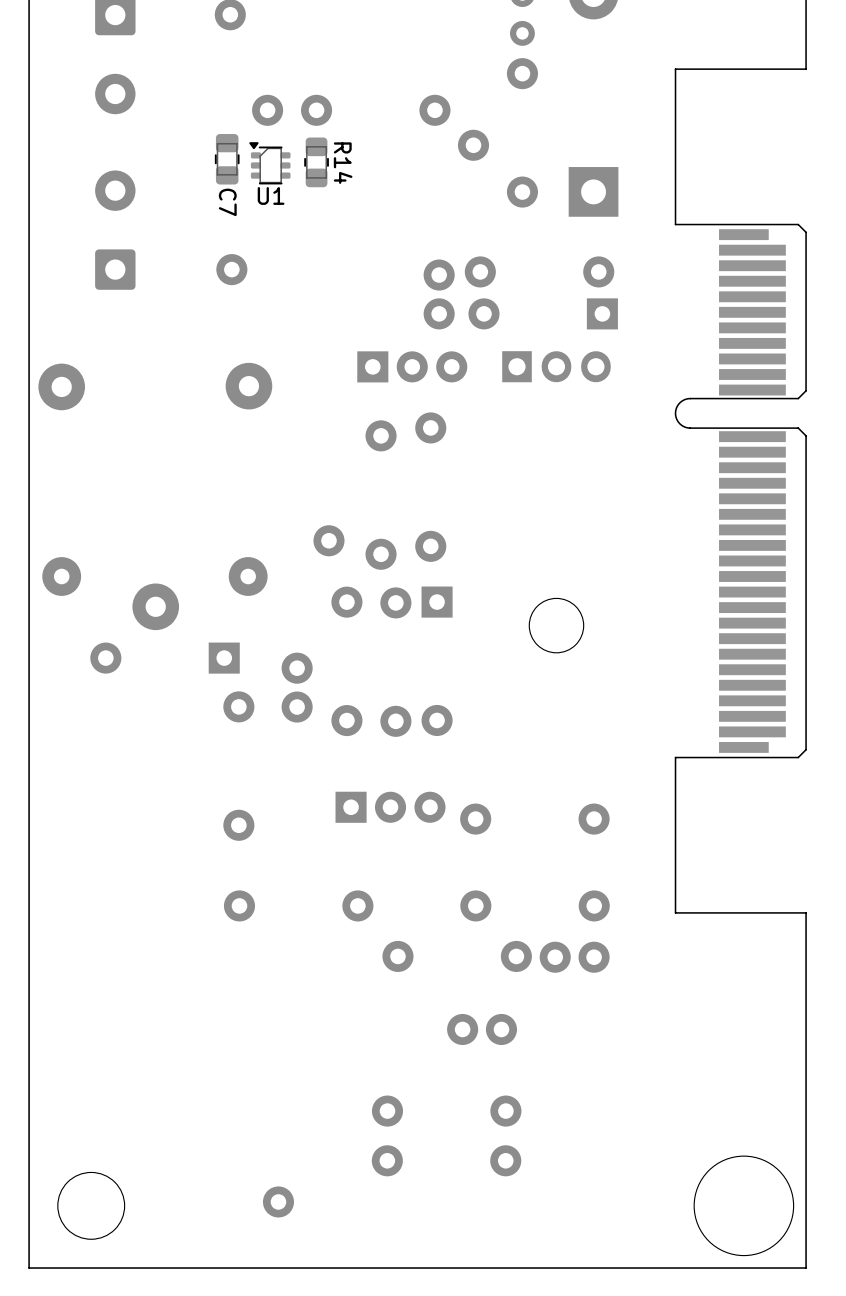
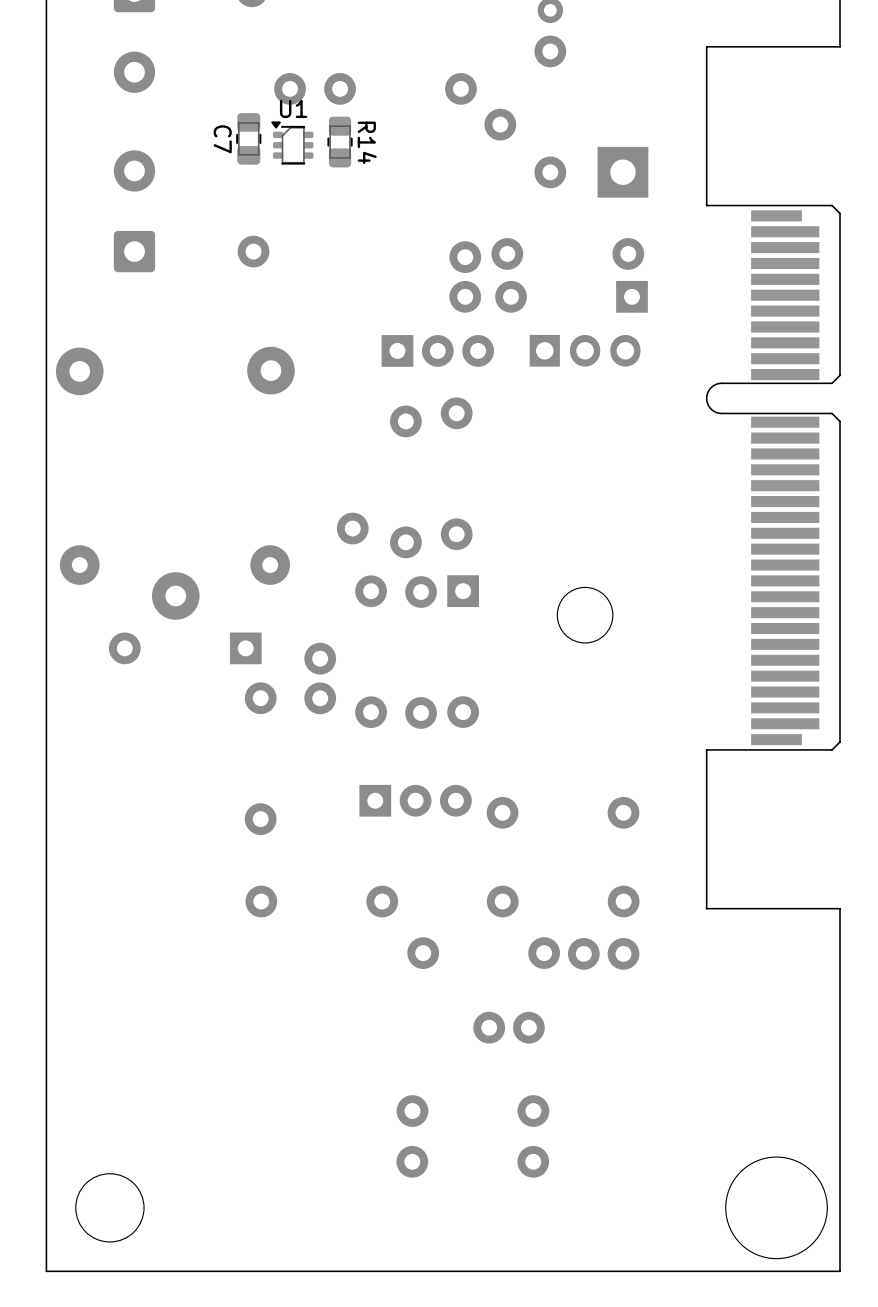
U1 name position: U1 (271, 195) -> U1 (293, 108)
C7 name position: C7 (227, 202) -> C7 (222, 139)
part: (278, 1201) -> none

